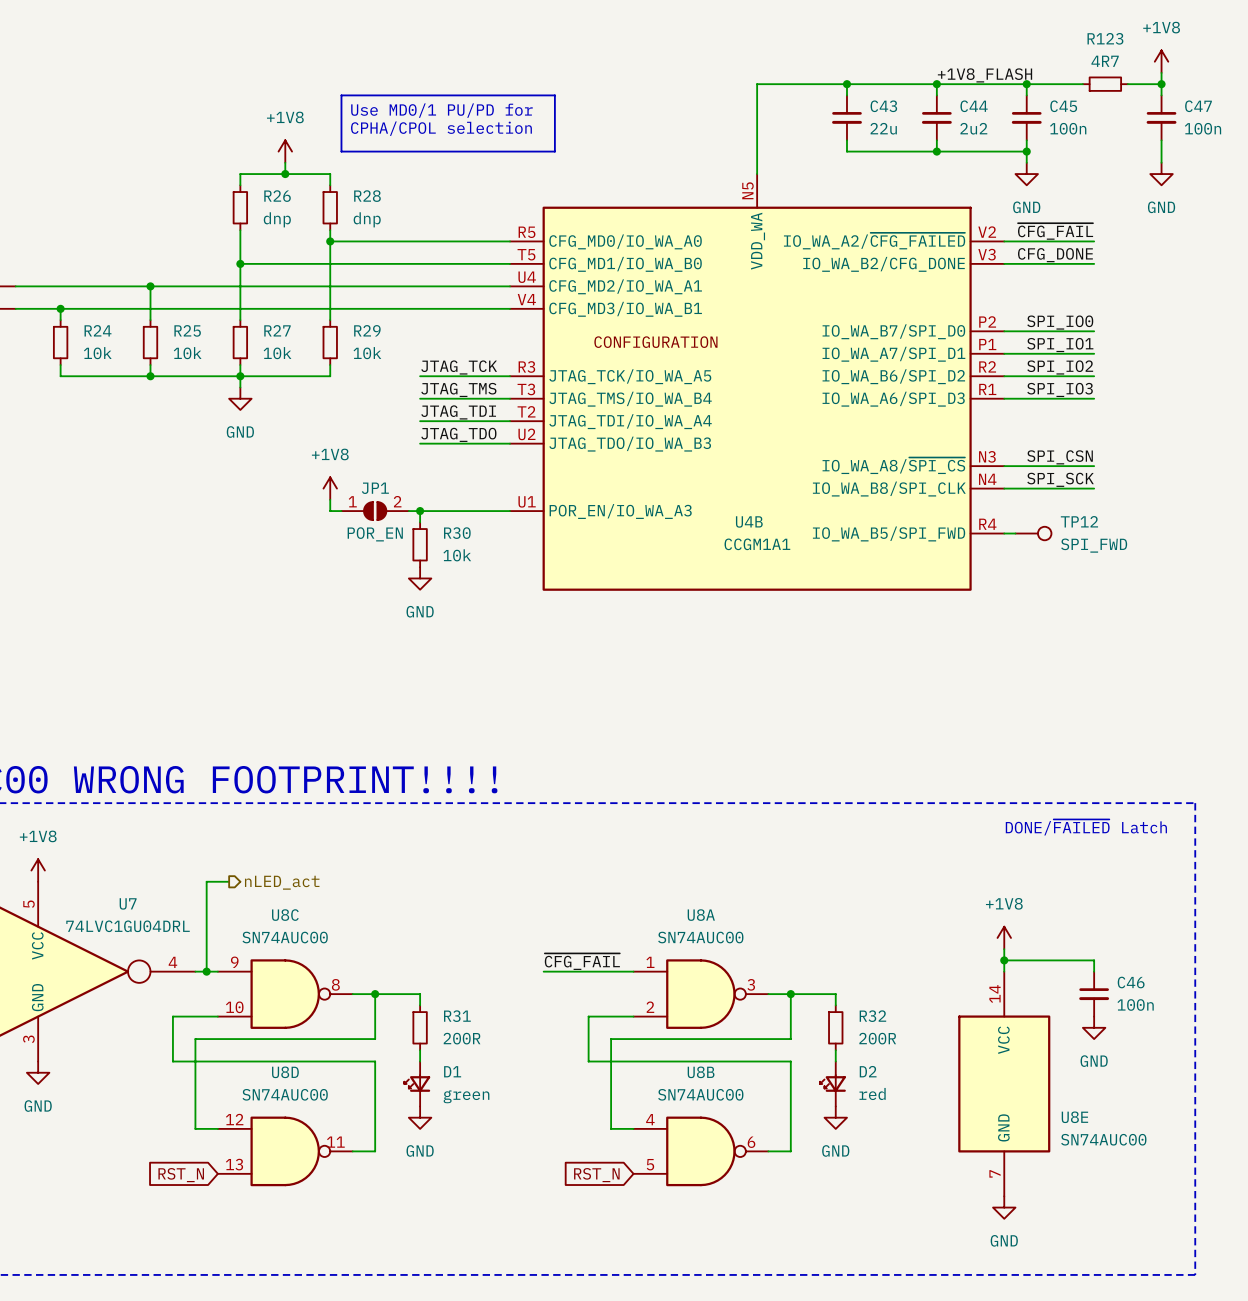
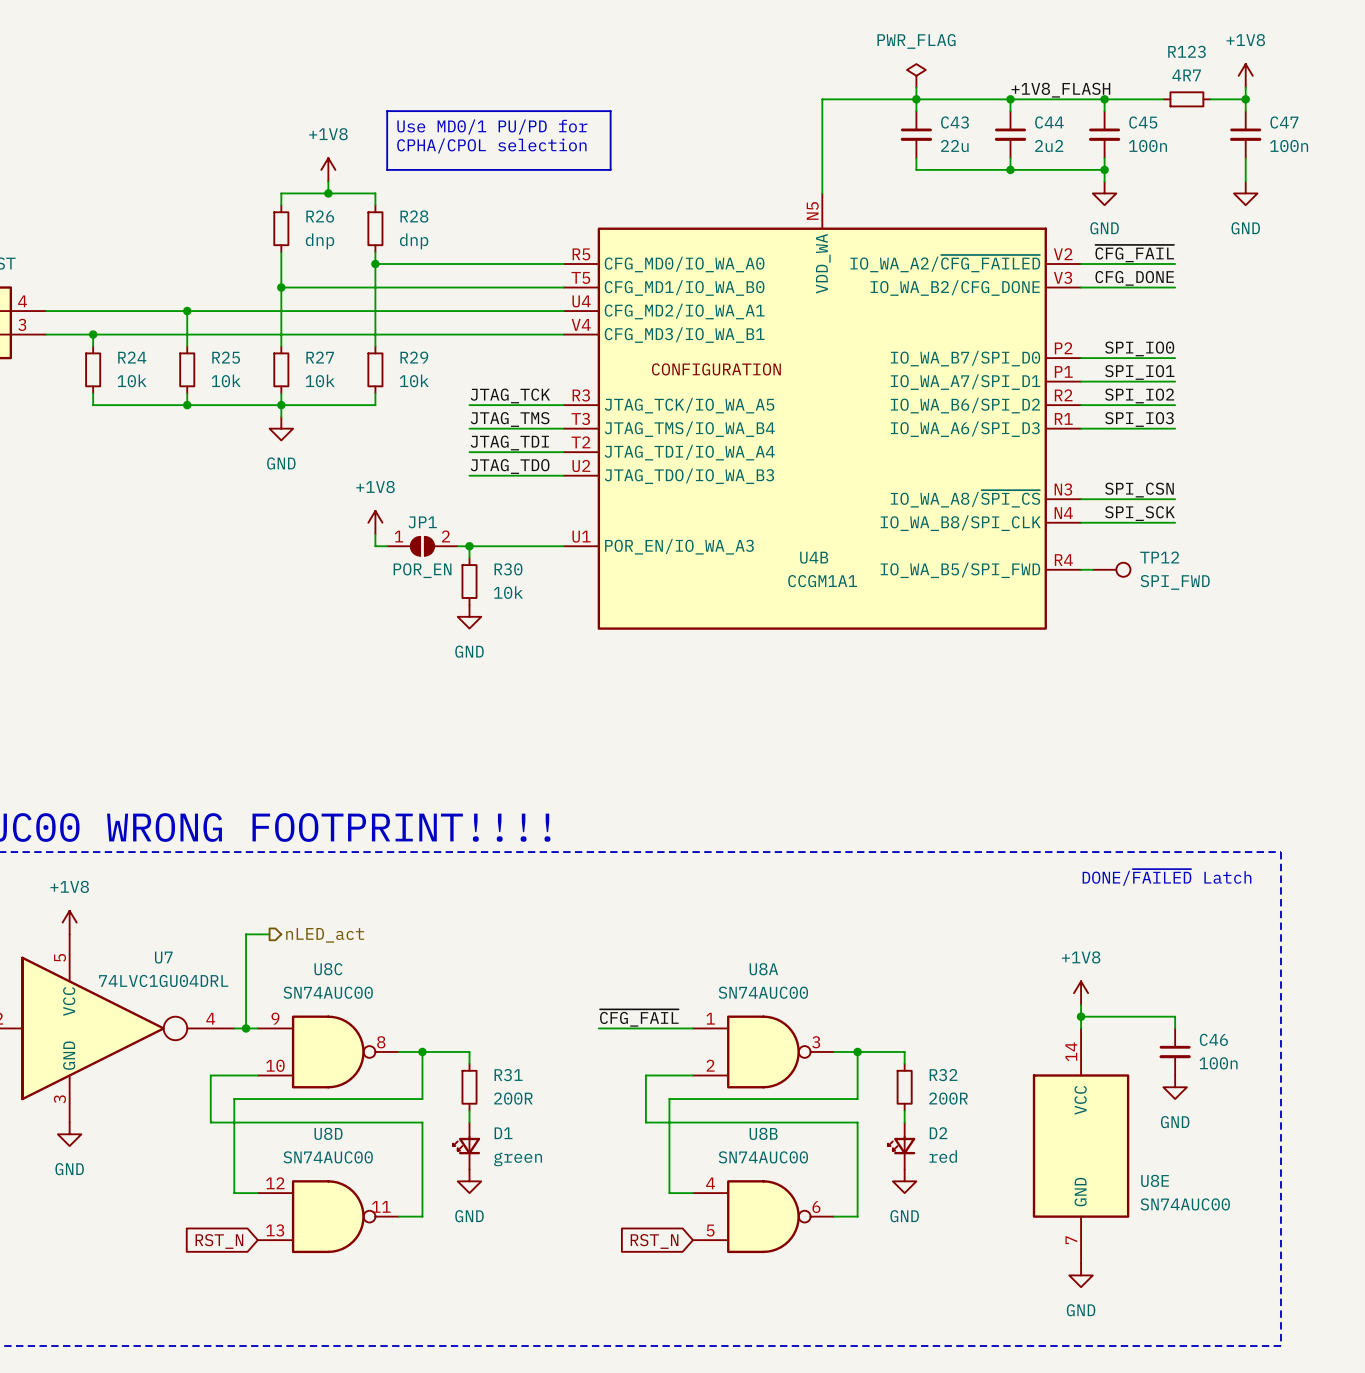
power symbol: none -> PWR_FLAG (916, 75)
wire: none -> (916, 87) (916, 99)

